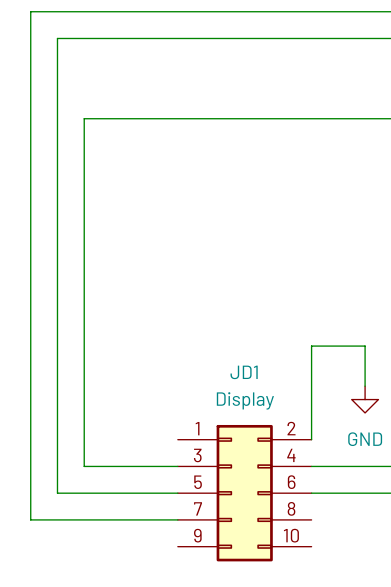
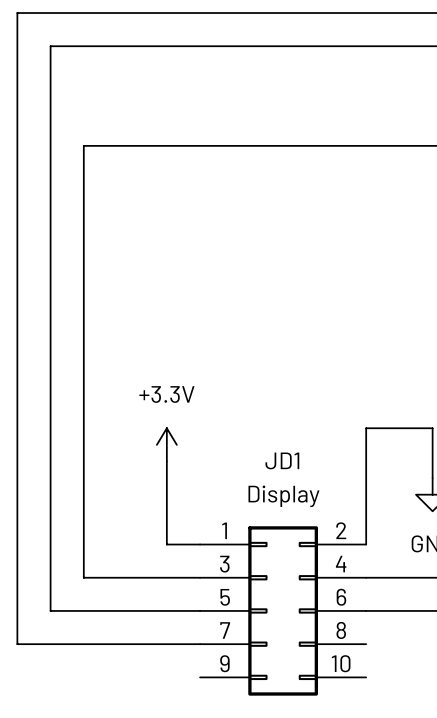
power symbol: none -> +3.3V (166, 444)
wire: none -> (166, 461) (166, 544) (200, 544)

